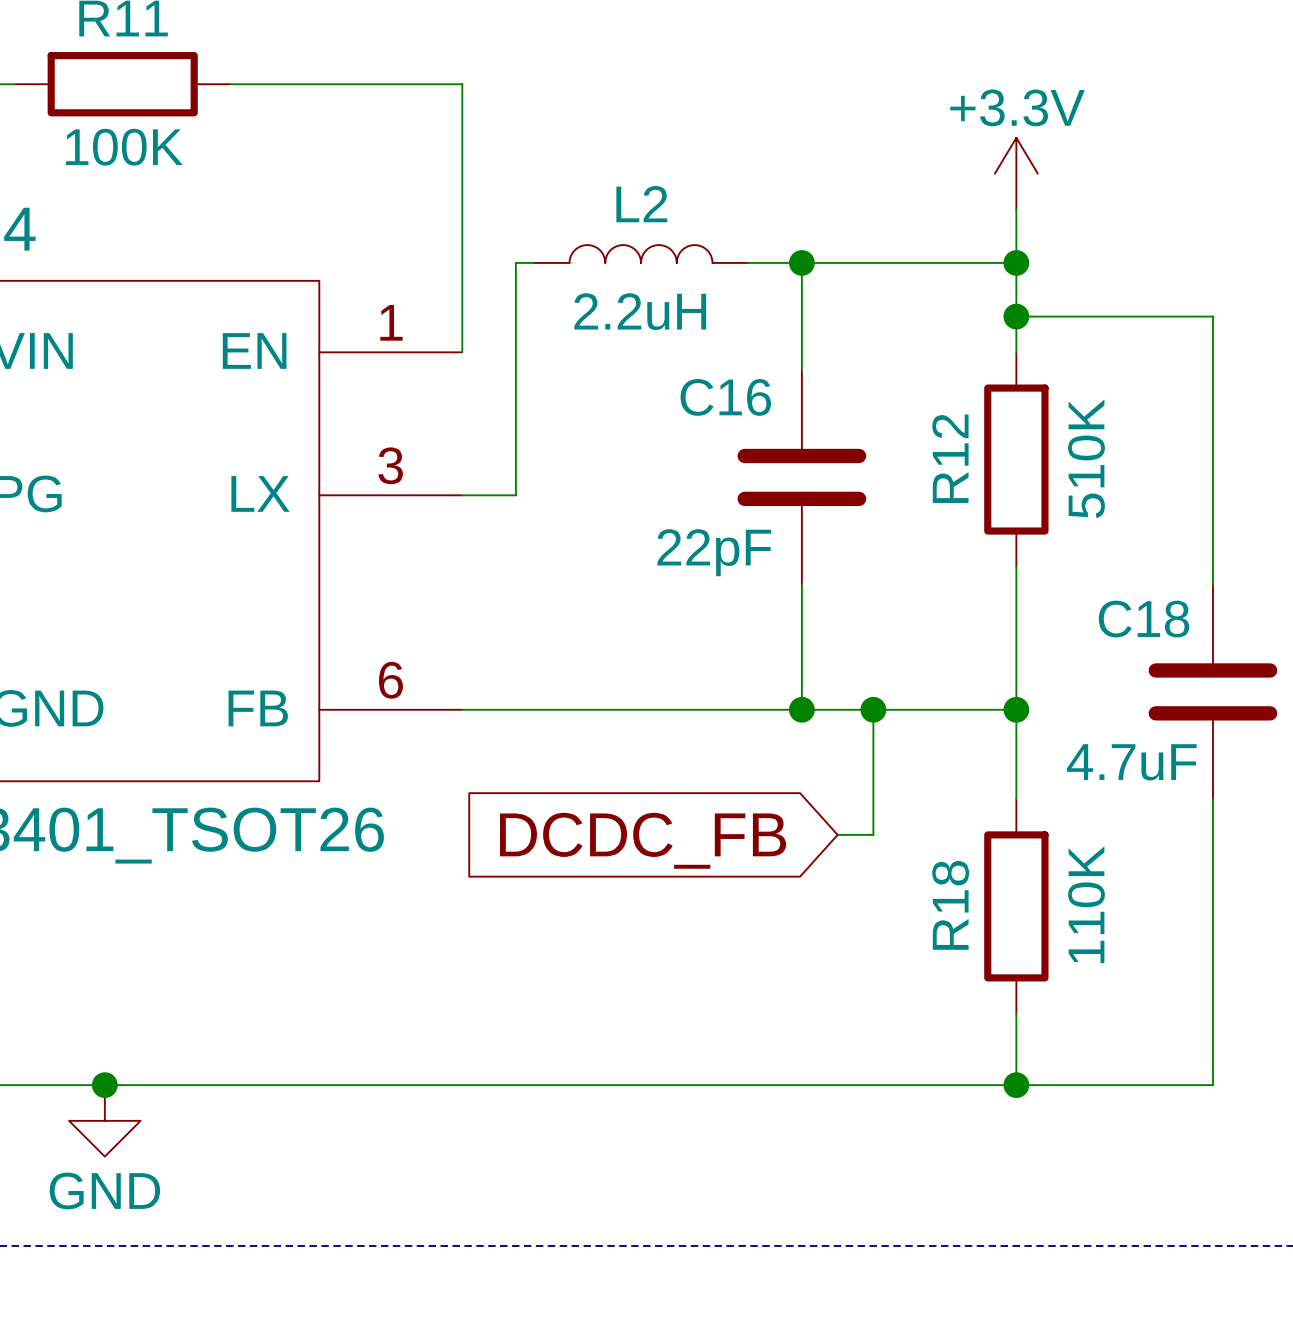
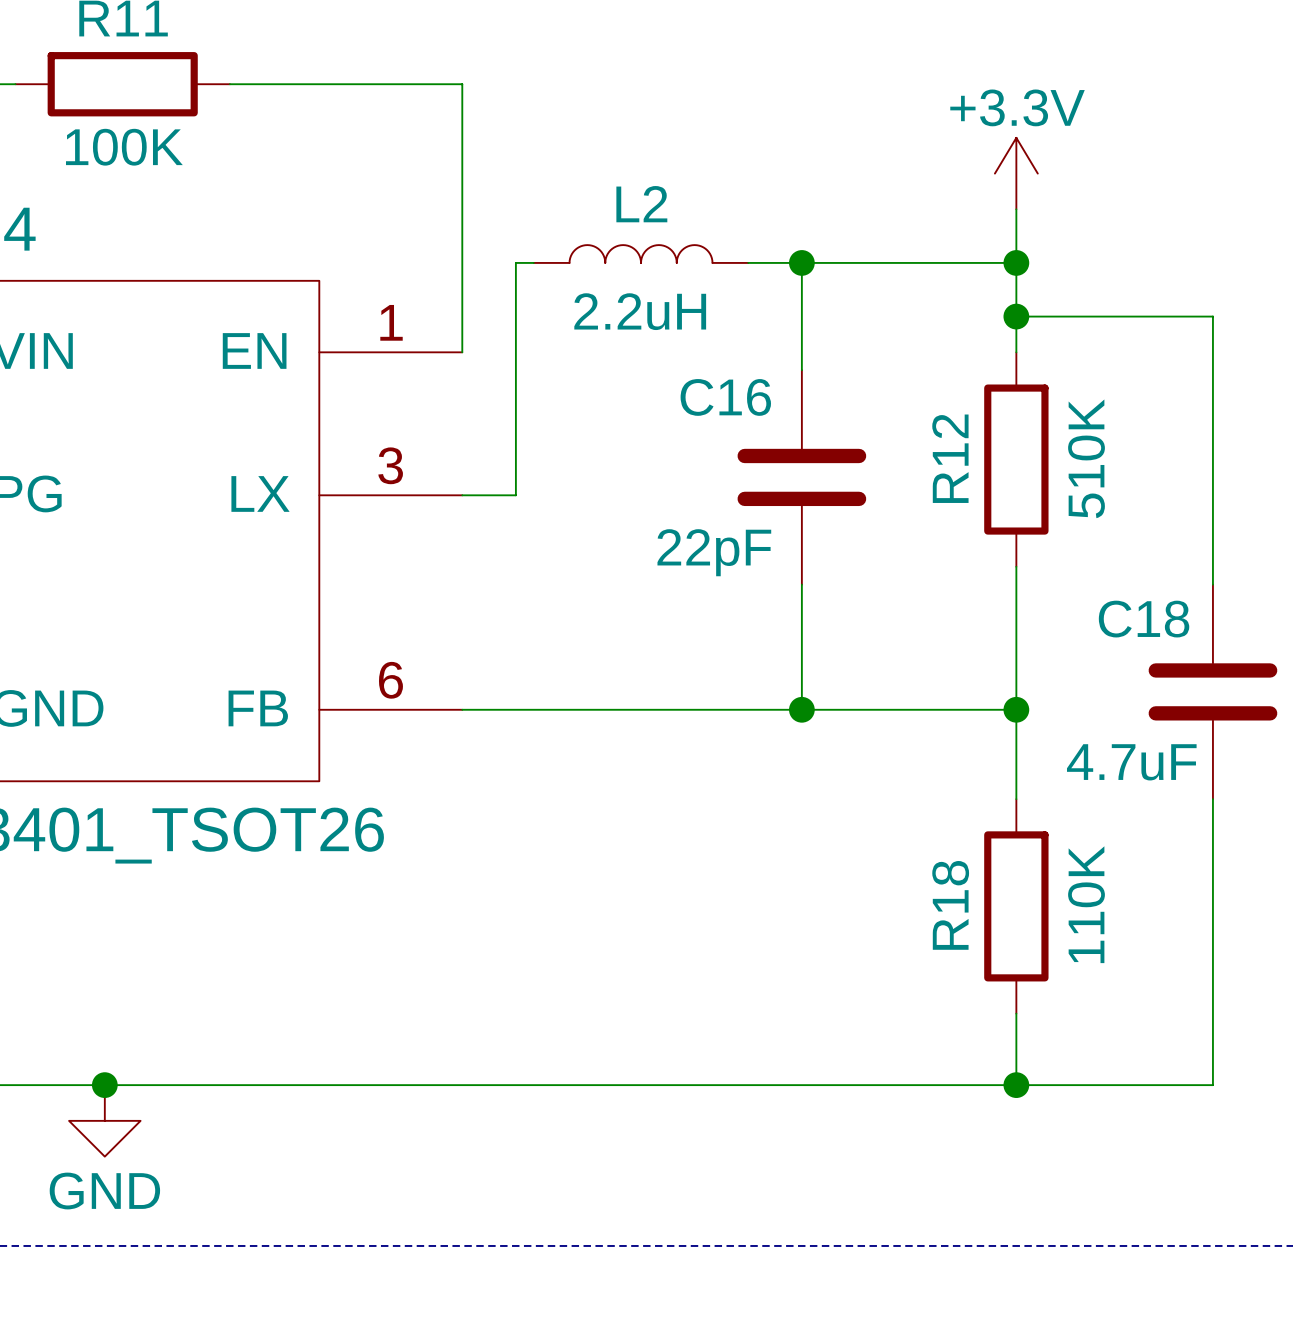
wire: (873, 709) (873, 834) (837, 834) -> none
junction: (873, 709) -> none
global label: DCDC_FB (643, 840) -> none

